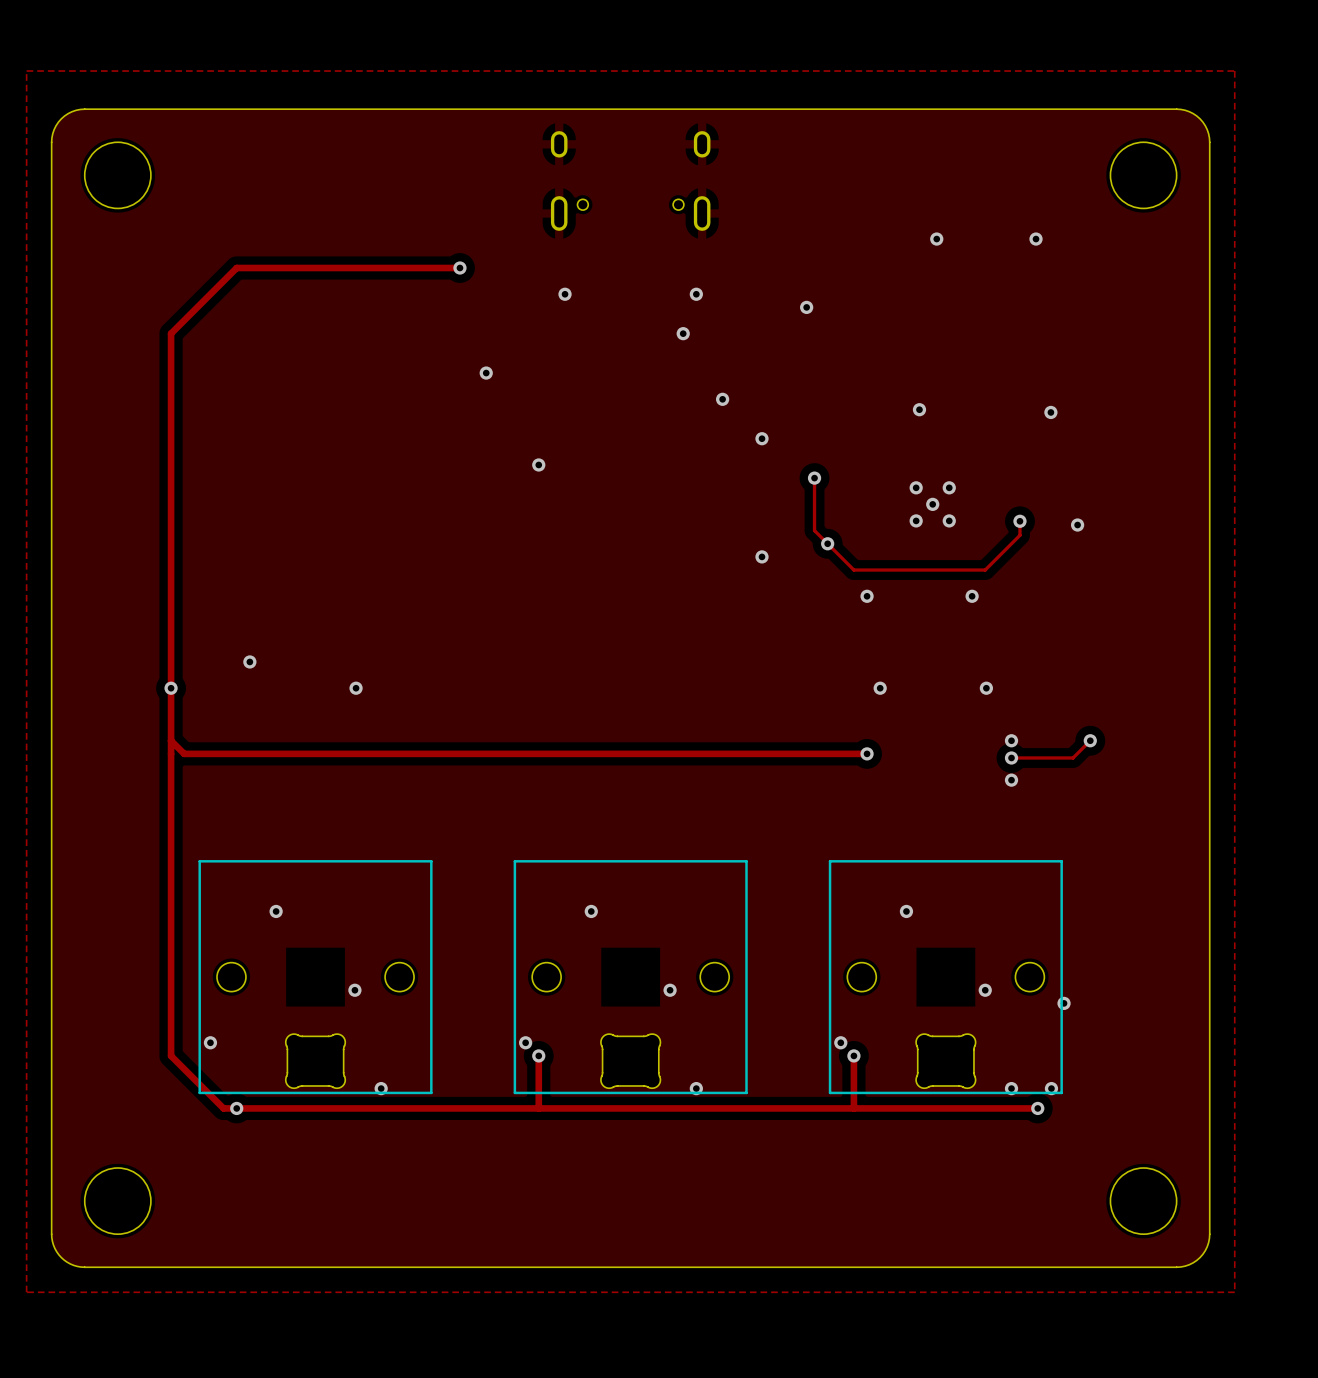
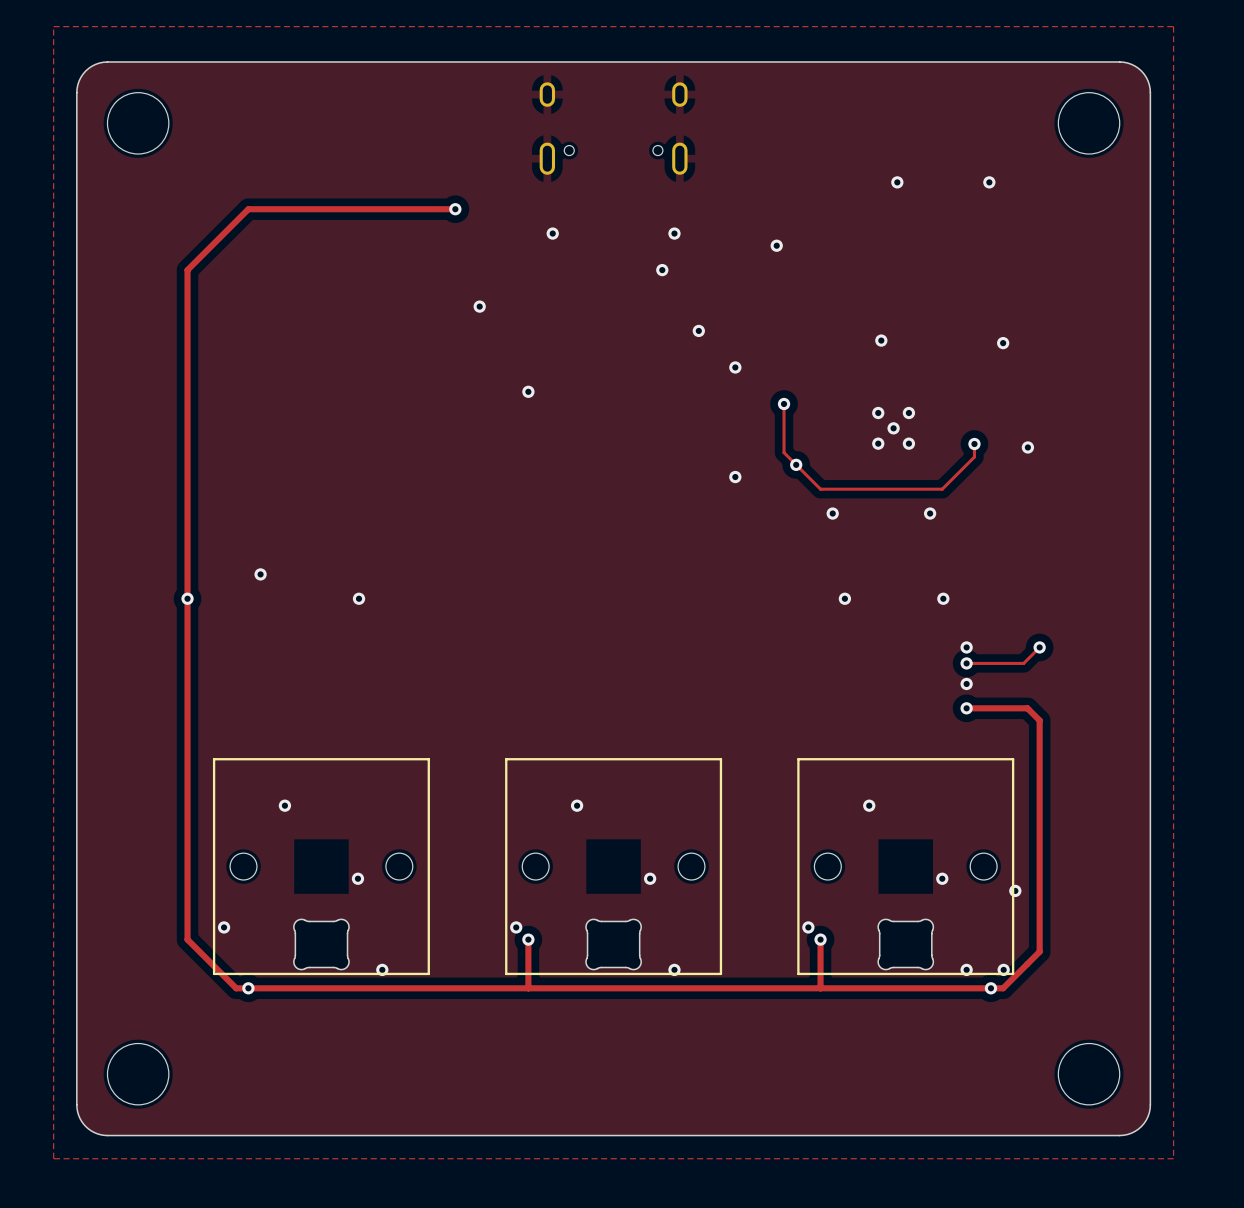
track: (171, 740) (184, 753) (867, 753) -> none
via: (867, 753) -> none
track: none -> (966, 708) (1027, 708) (1039, 720) (1039, 951) (1003, 988) (990, 988)
via: none -> (966, 708)

